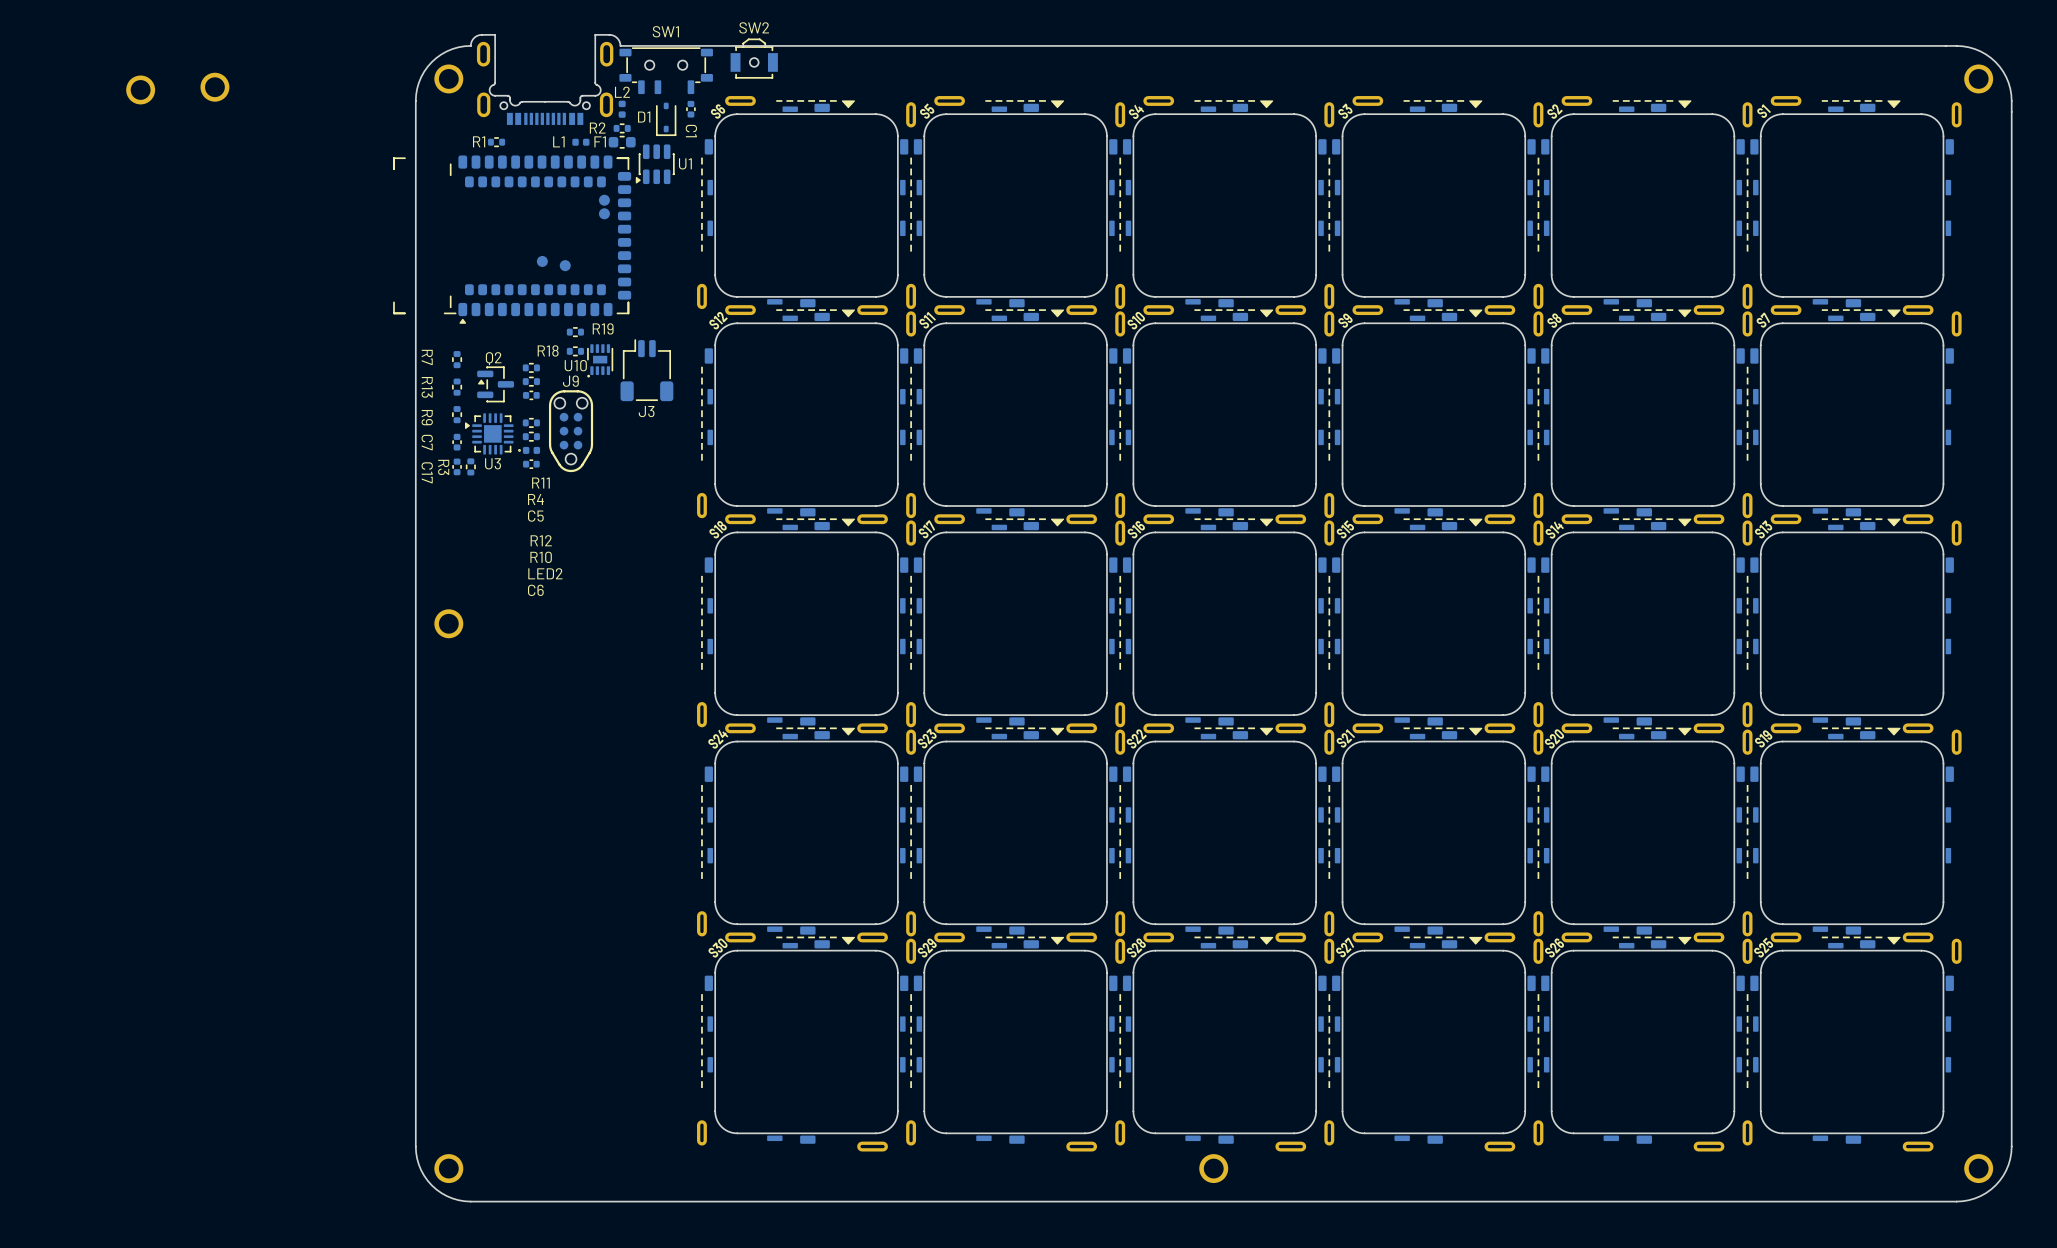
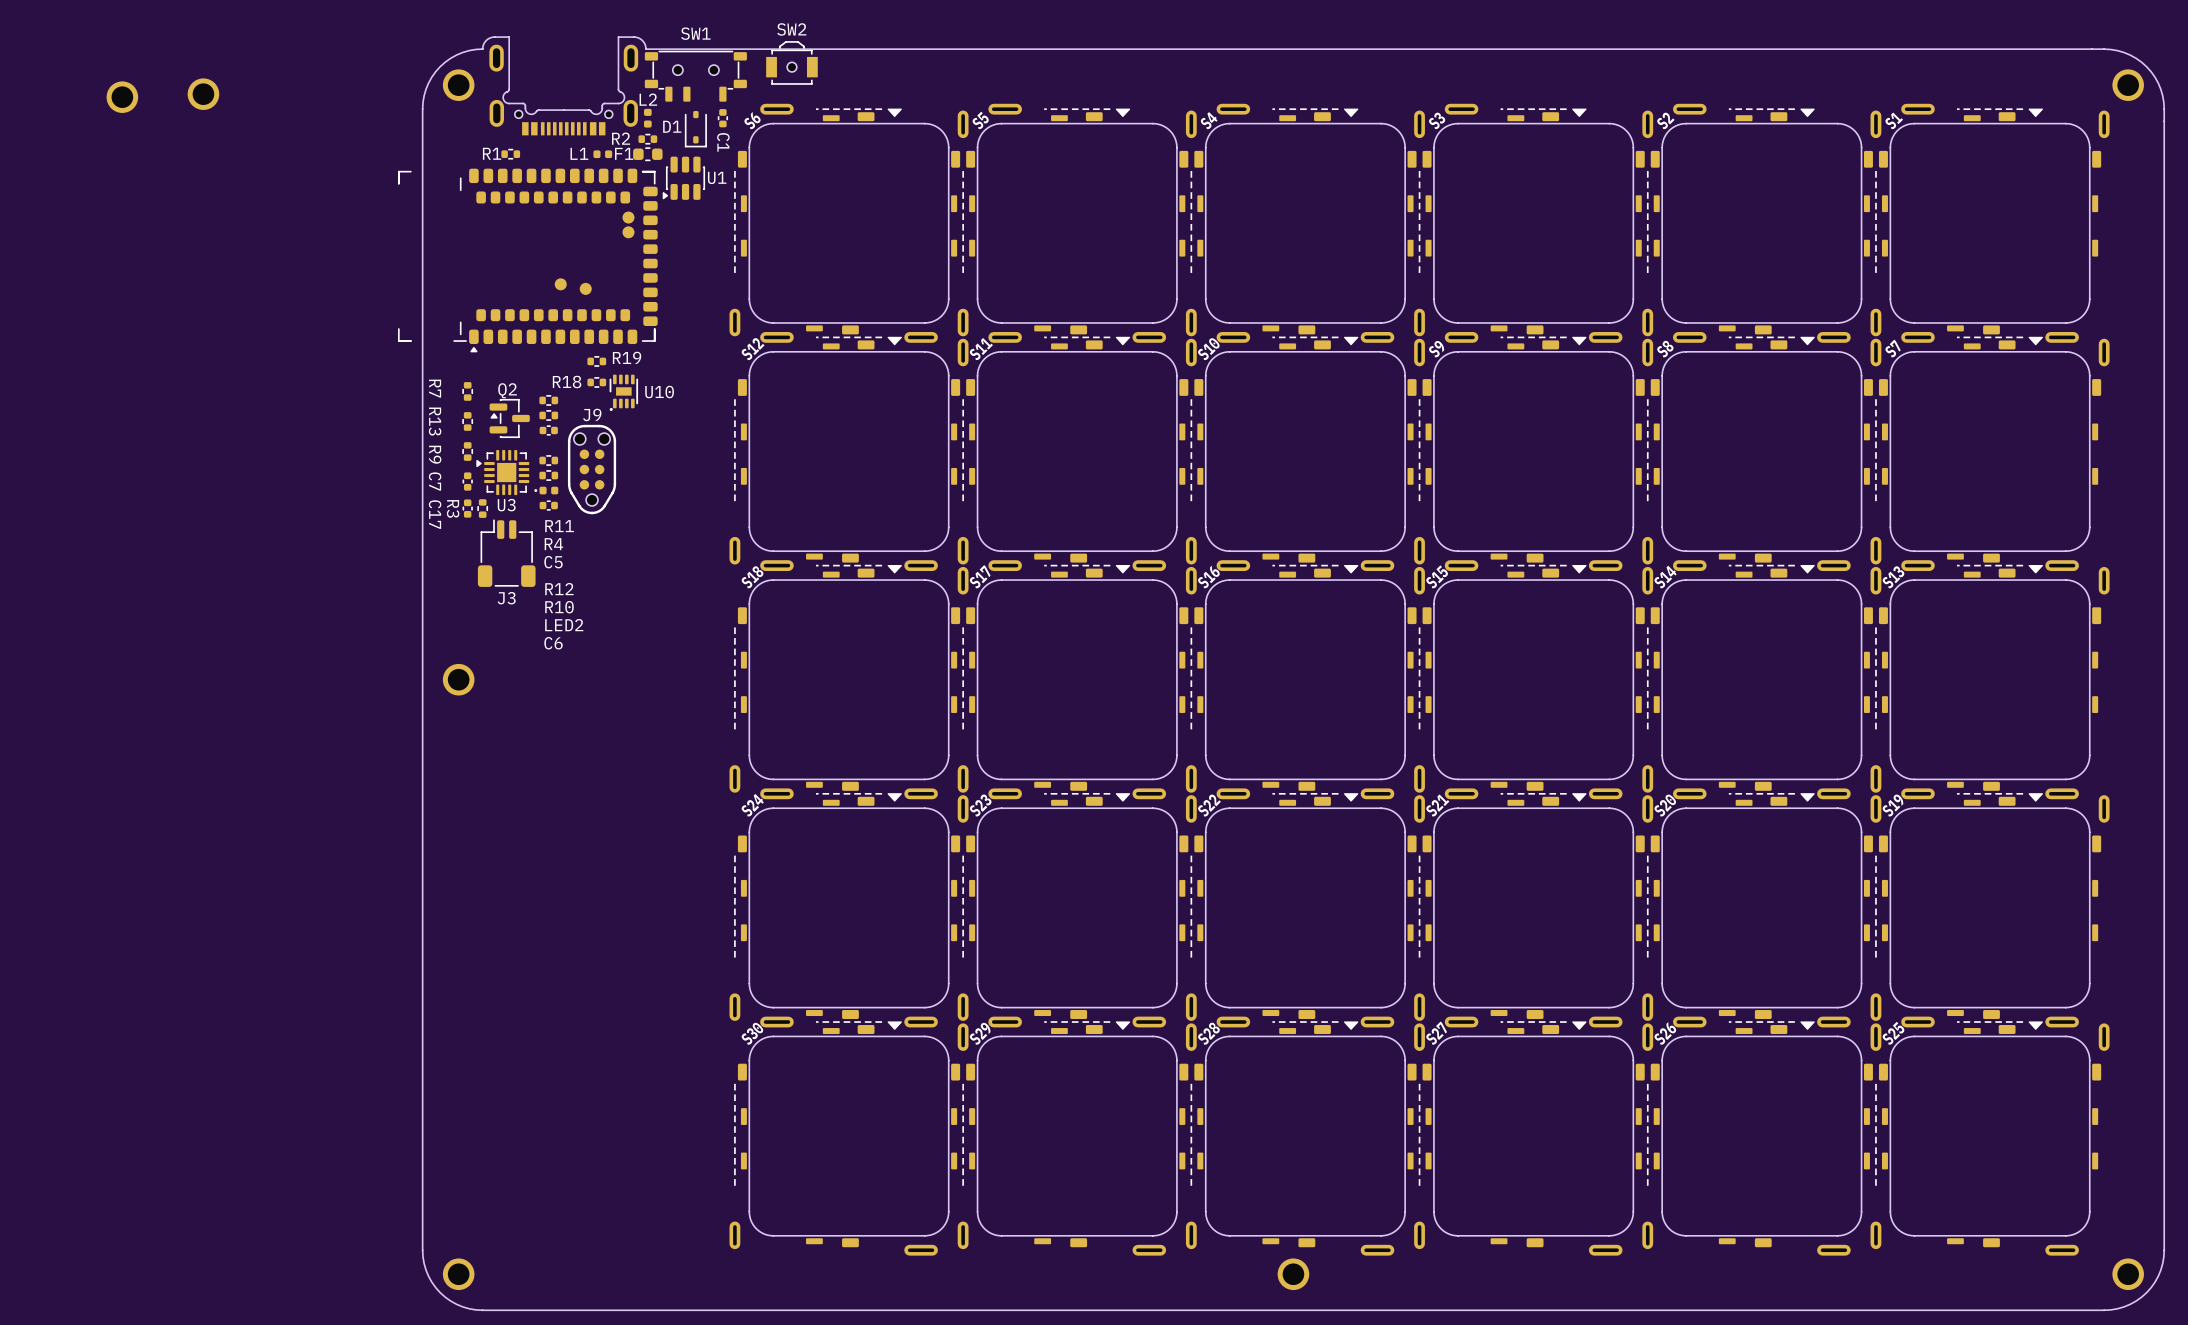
U10 name position: U10 (575, 365) -> U10 (659, 392)
J3 position: (646, 370) -> (506, 553)

